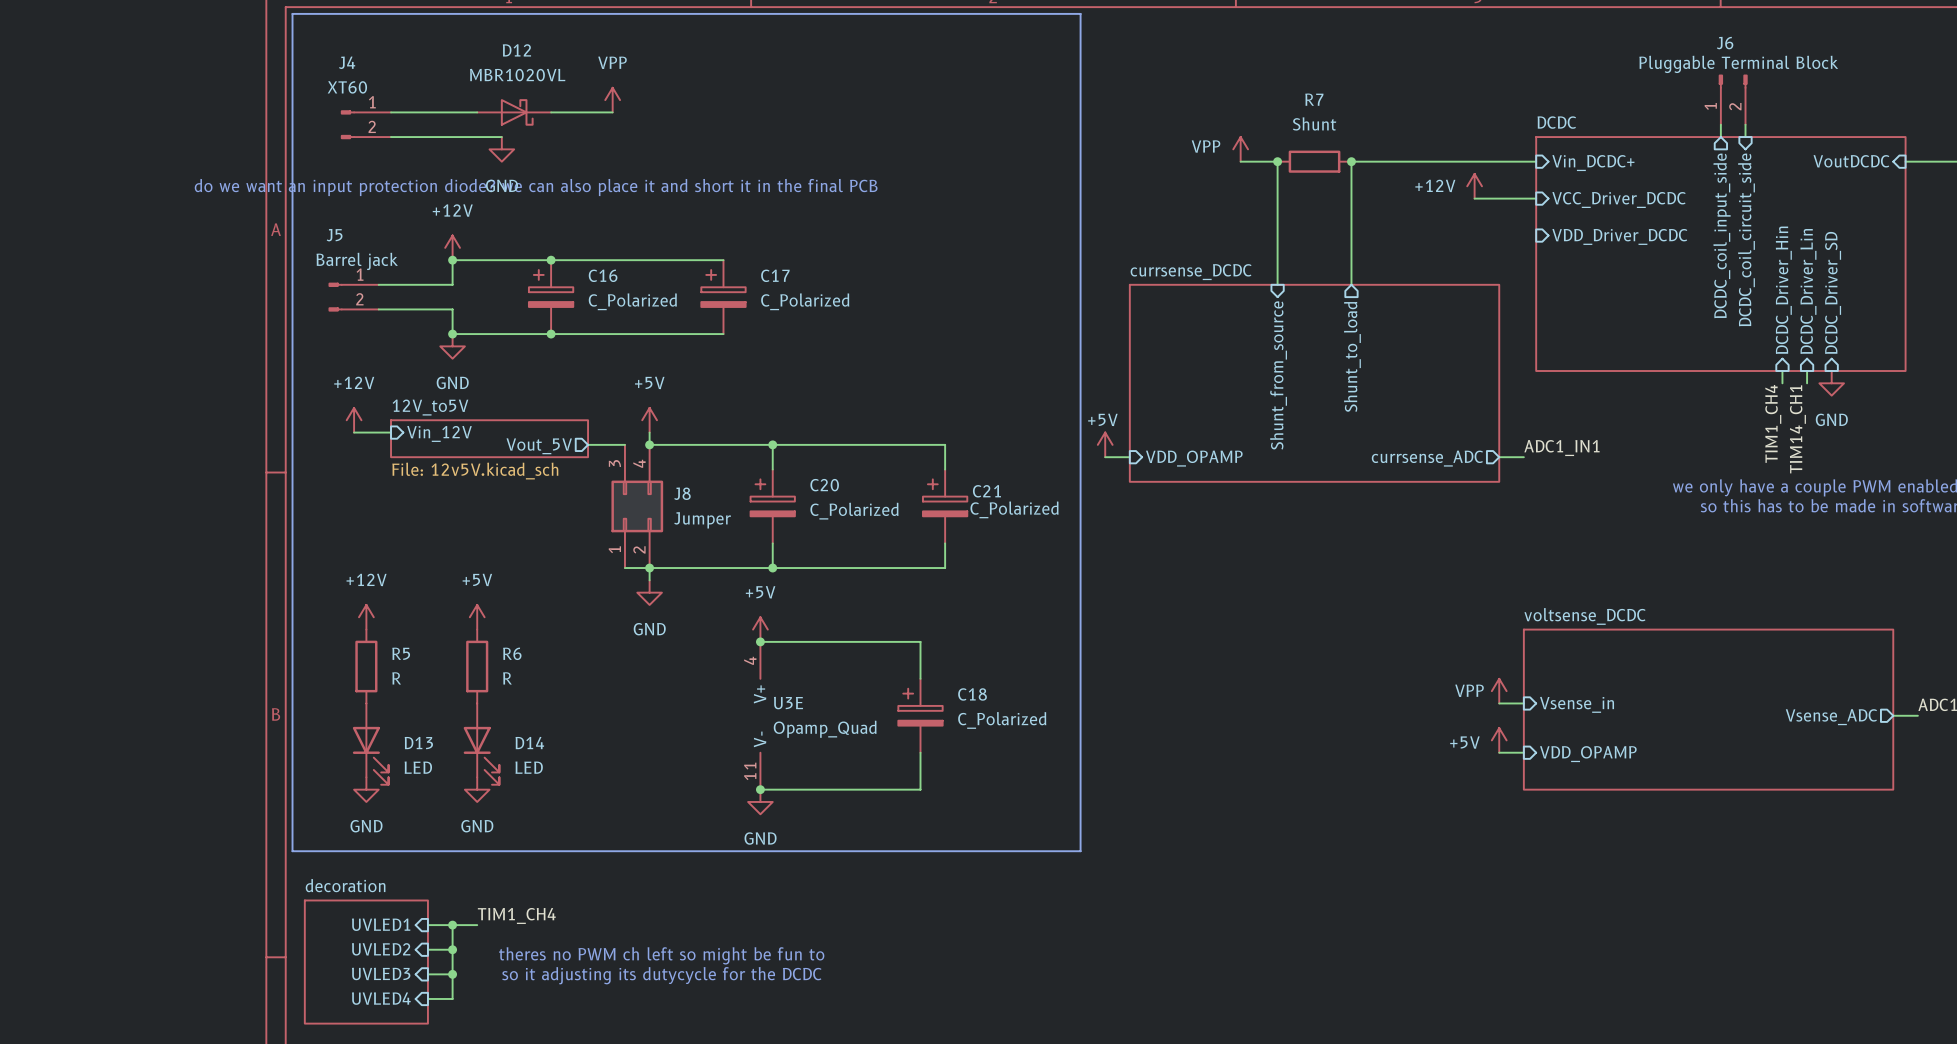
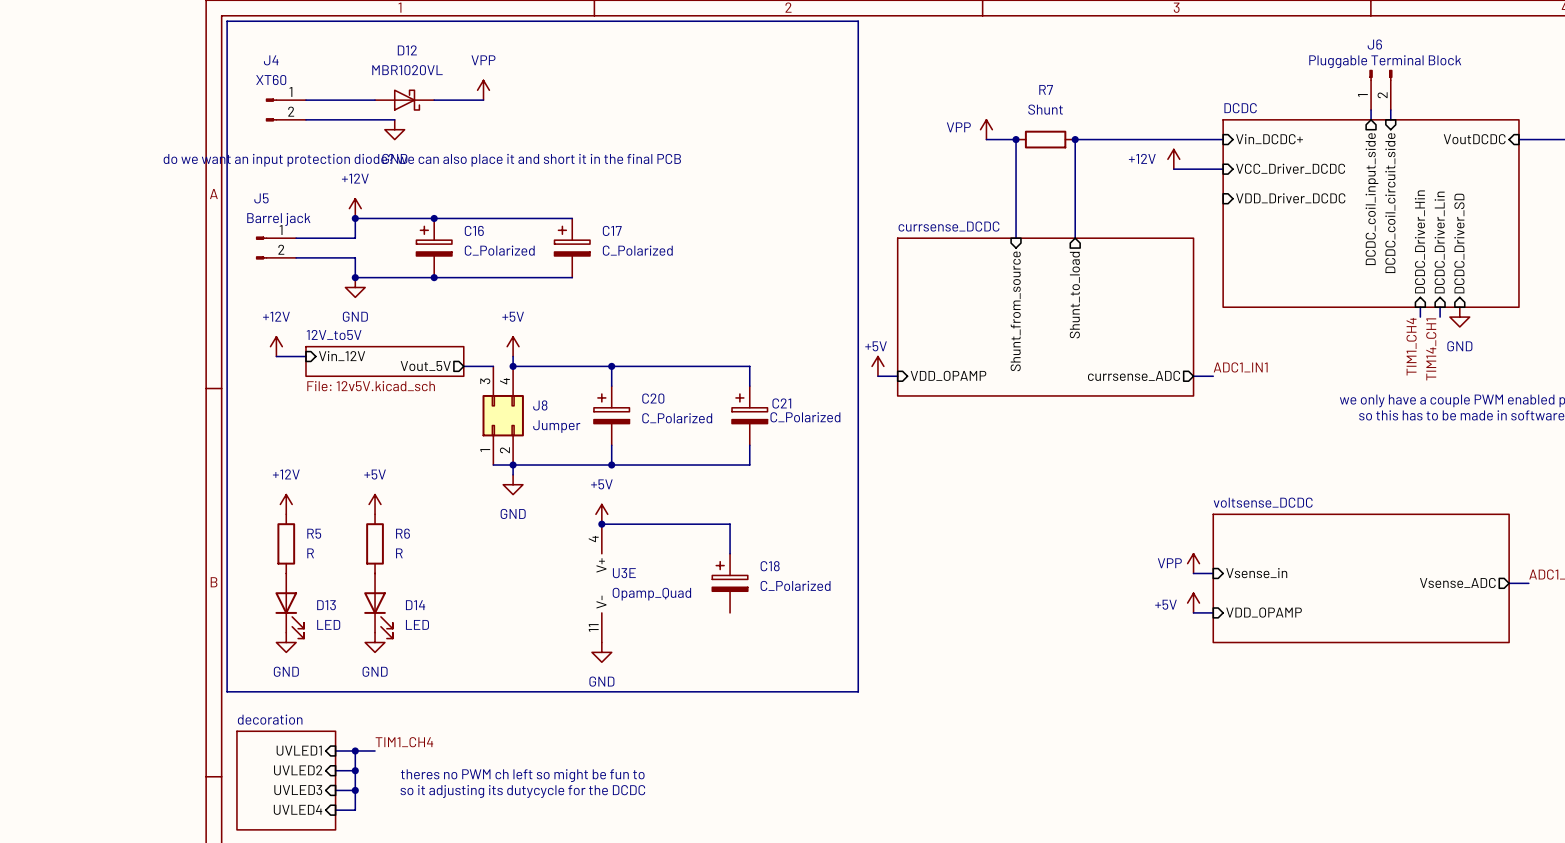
wire: (920, 752) (920, 789) (760, 789) -> none
junction: (760, 789) -> none

